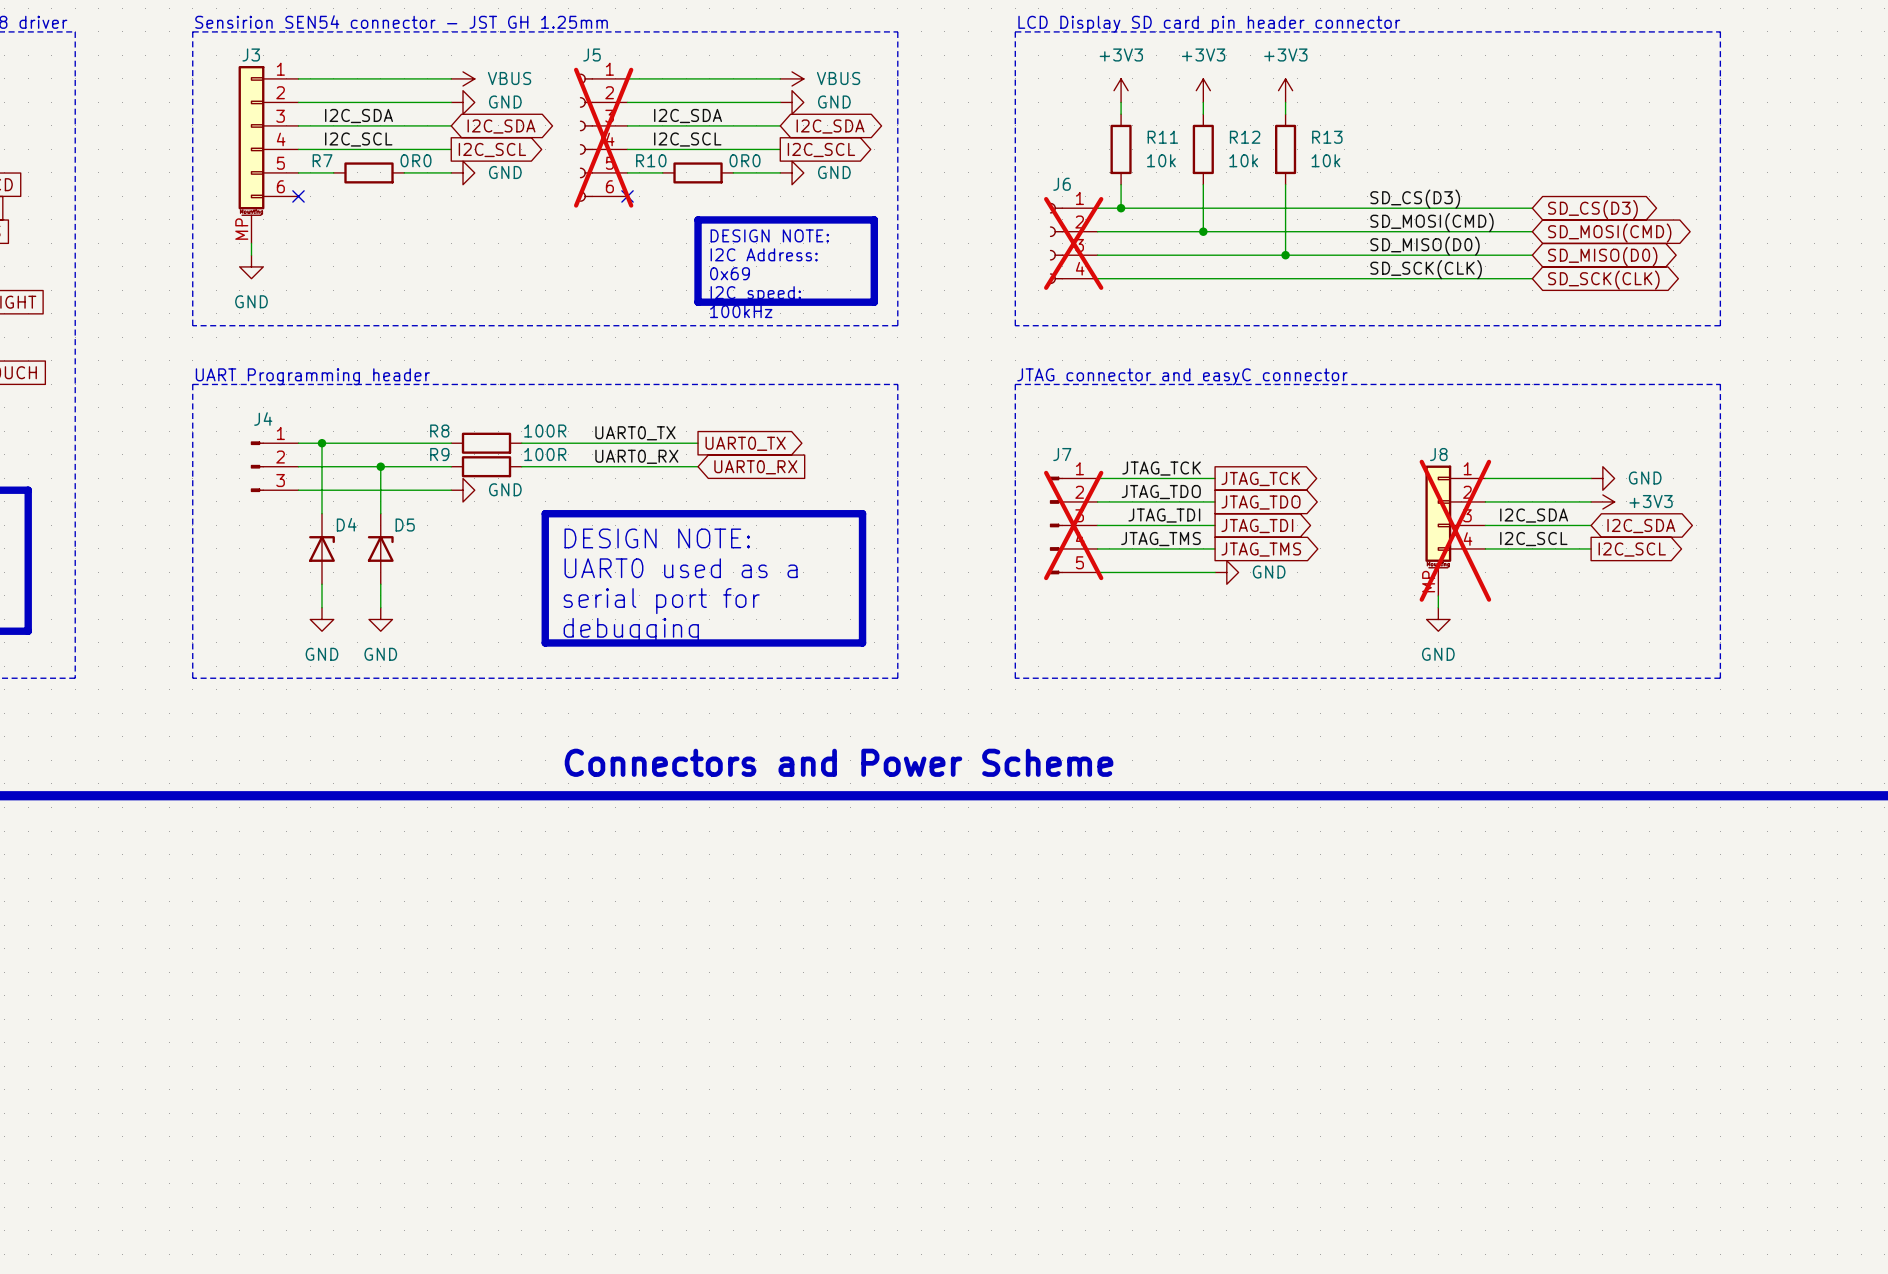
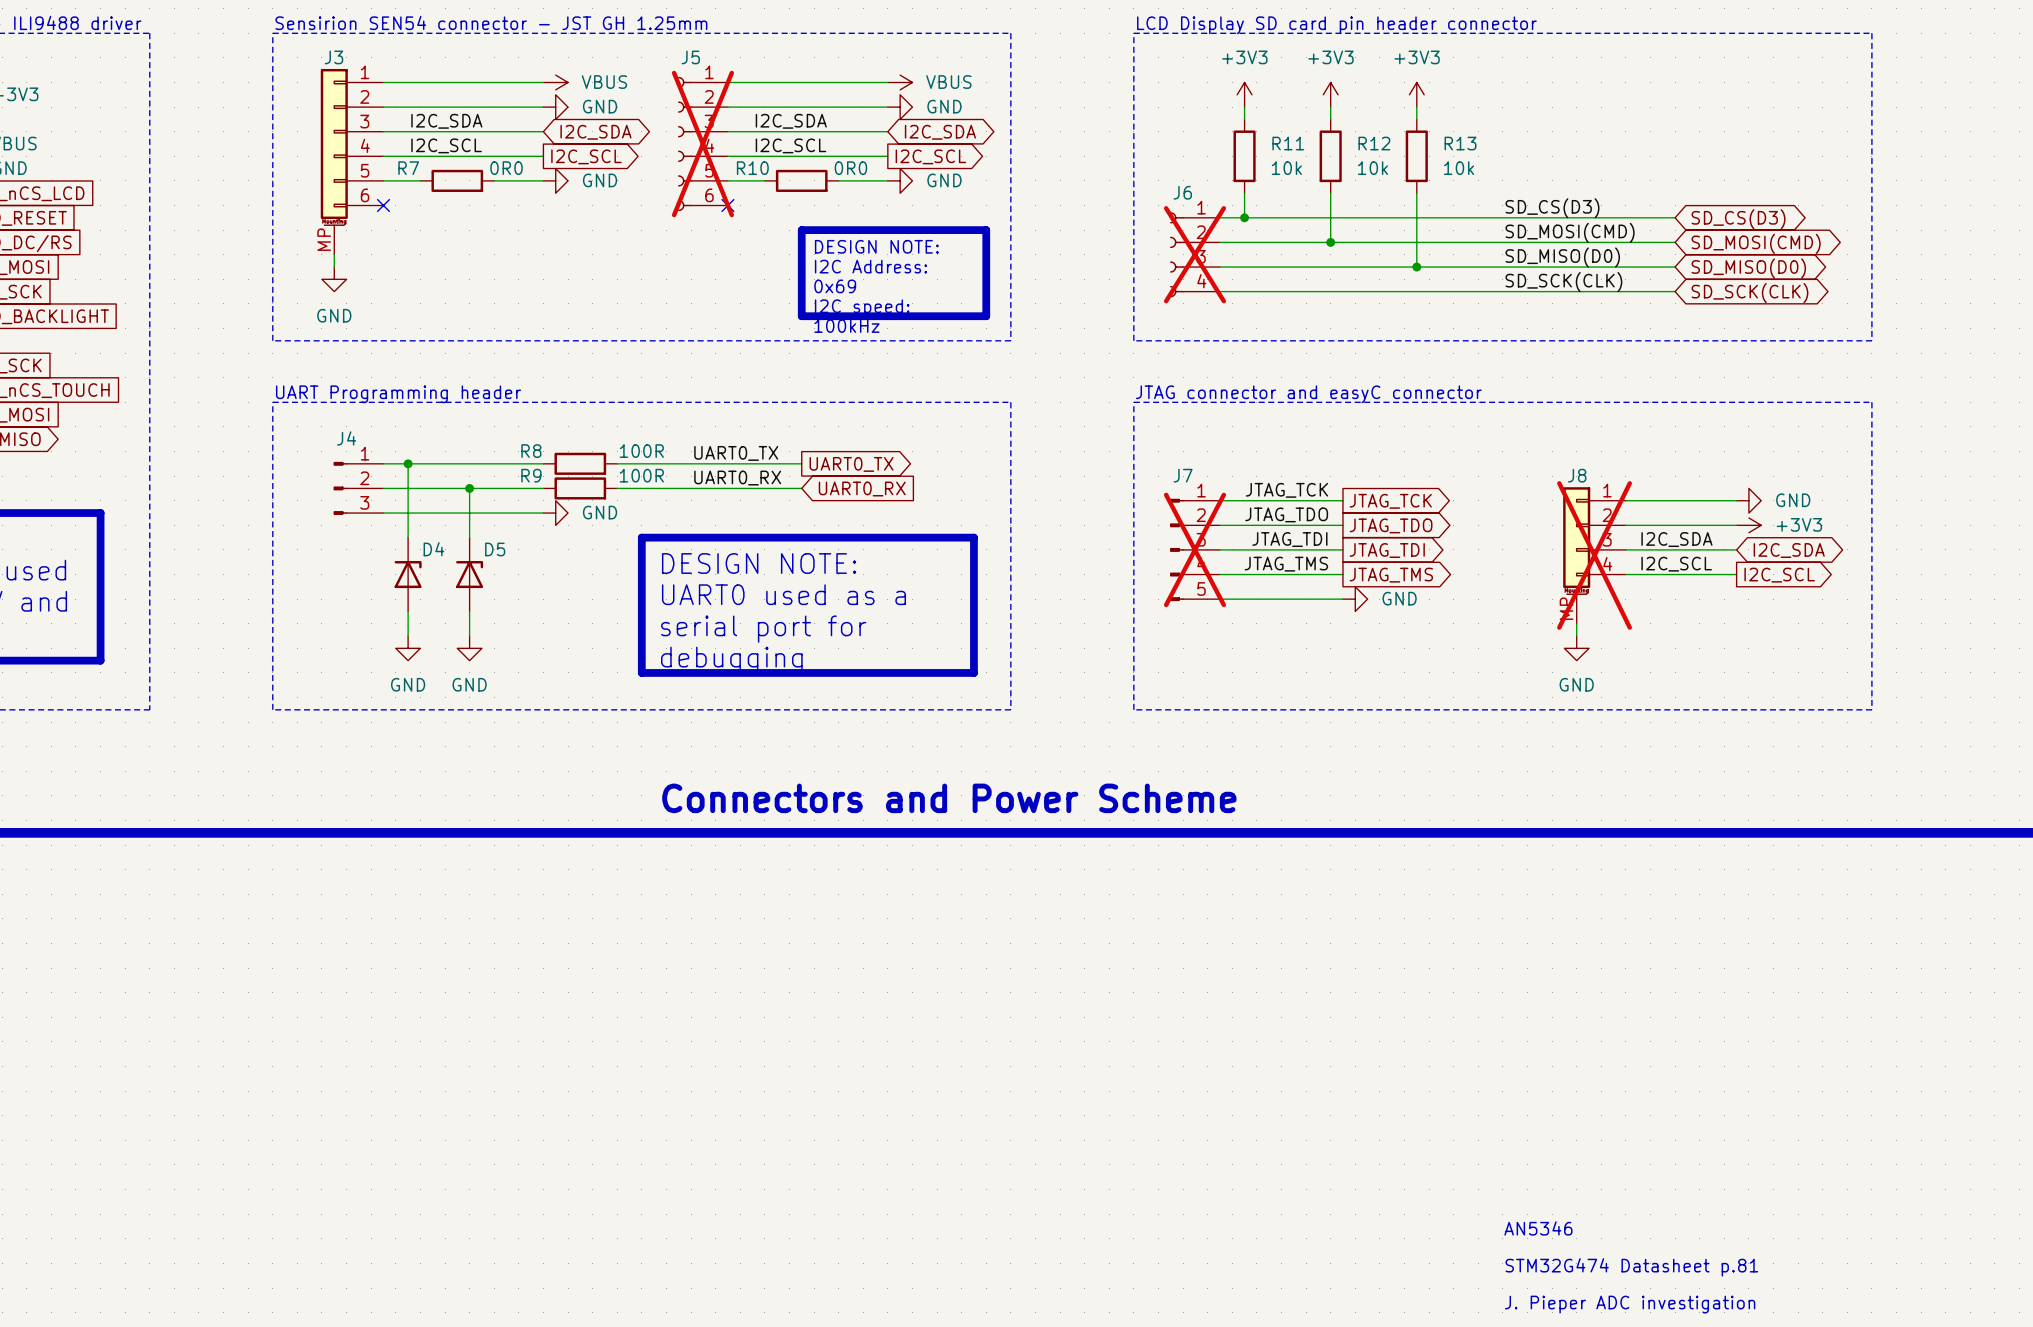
text: none -> AN5346 (1538, 1228)
text: none -> STM32G474 Datasheet p.81 (1631, 1267)
text: none -> J. Pieper ADC investigation (1630, 1304)

